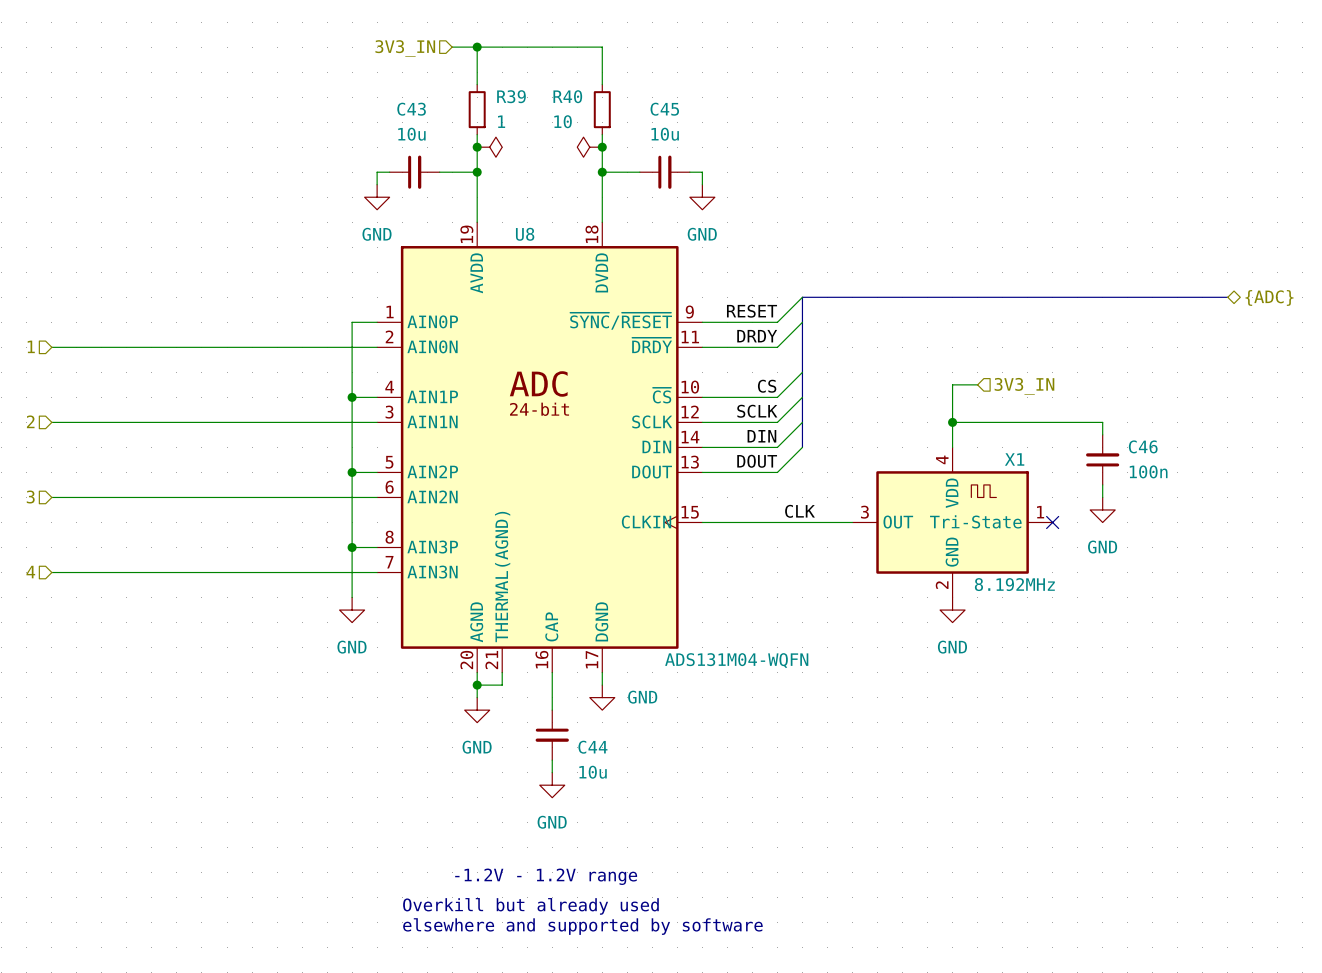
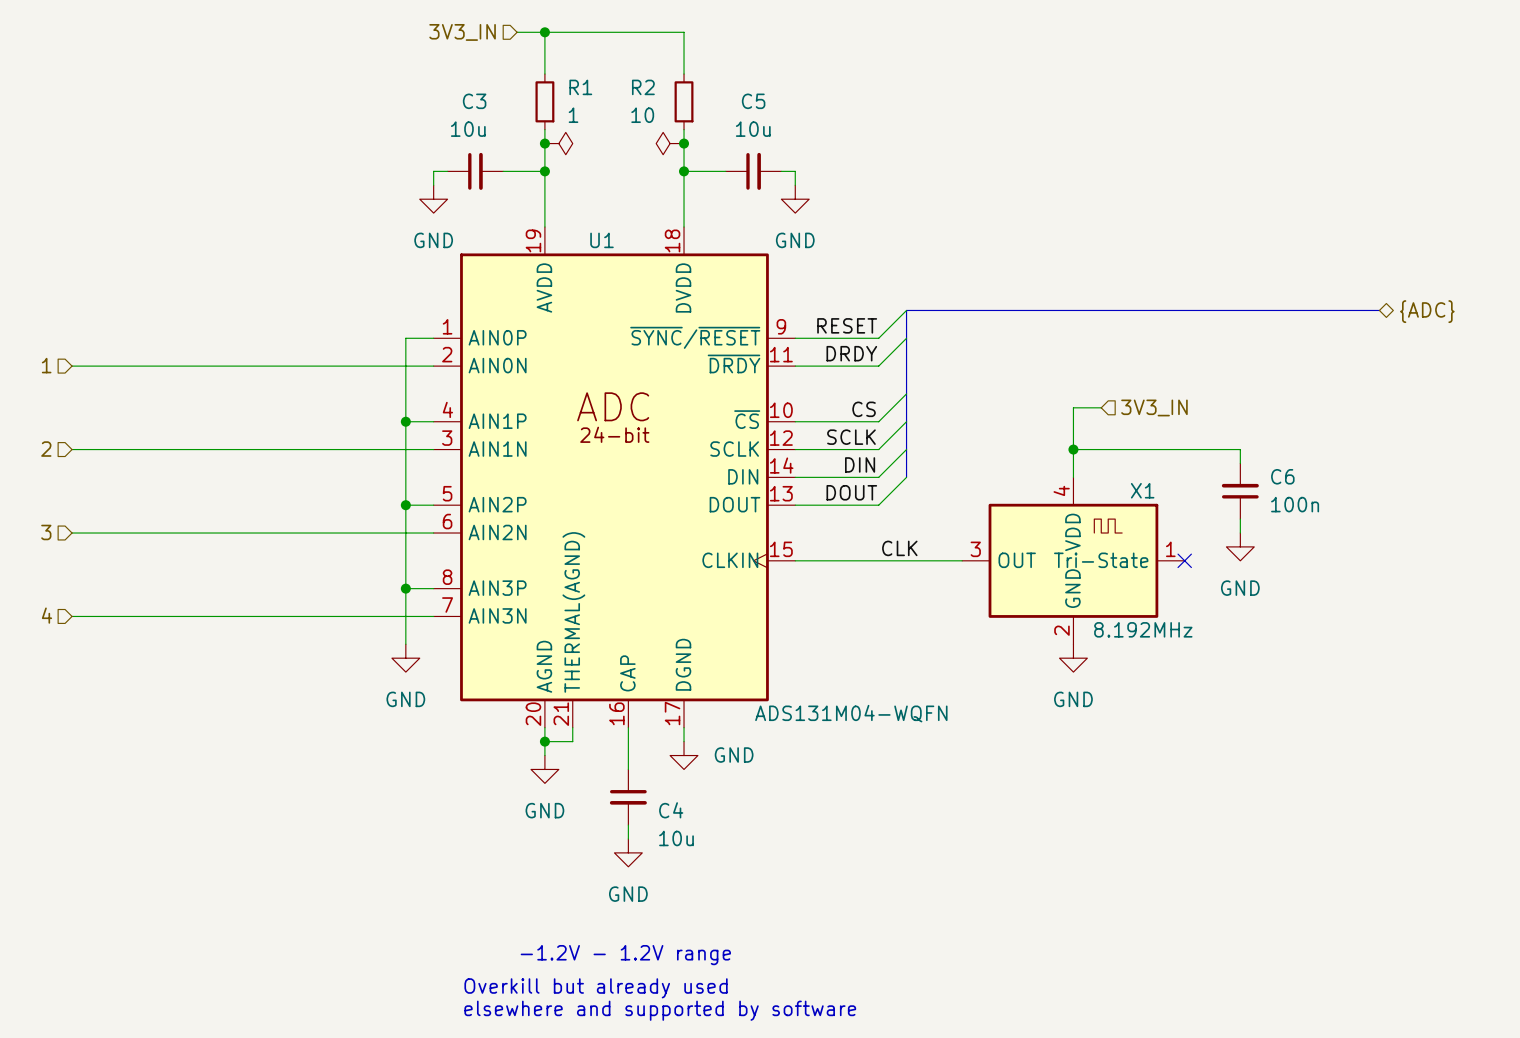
R39 name: R39 (511, 96) -> R1 (580, 87)
R40 name: R40 (567, 96) -> R2 (643, 87)
C43 name: C43 (411, 109) -> C3 (474, 101)
C45 name: C45 (664, 109) -> C5 (753, 101)
U8 name: U8 (525, 234) -> U1 (601, 240)
C46 name: C46 (1143, 446) -> C6 (1282, 476)
C44 name: C44 (592, 747) -> C4 (671, 810)

